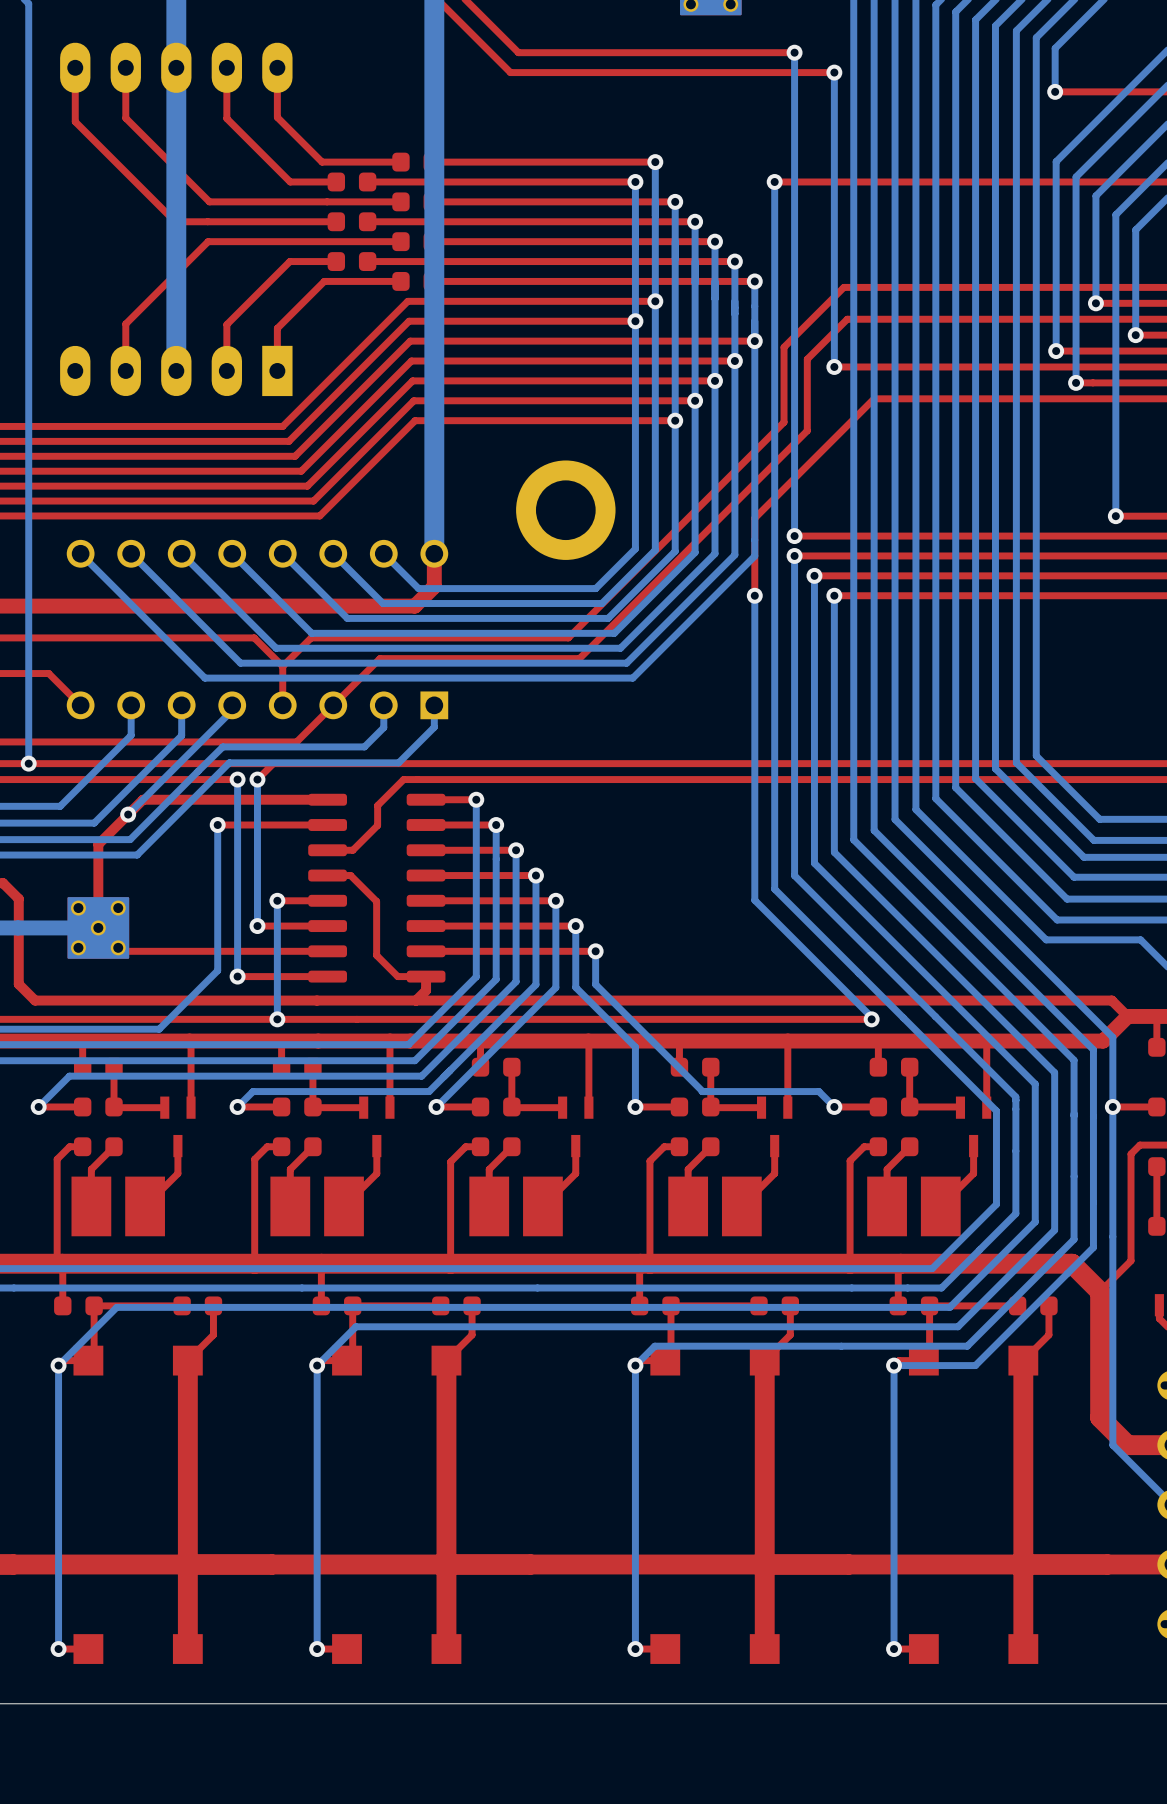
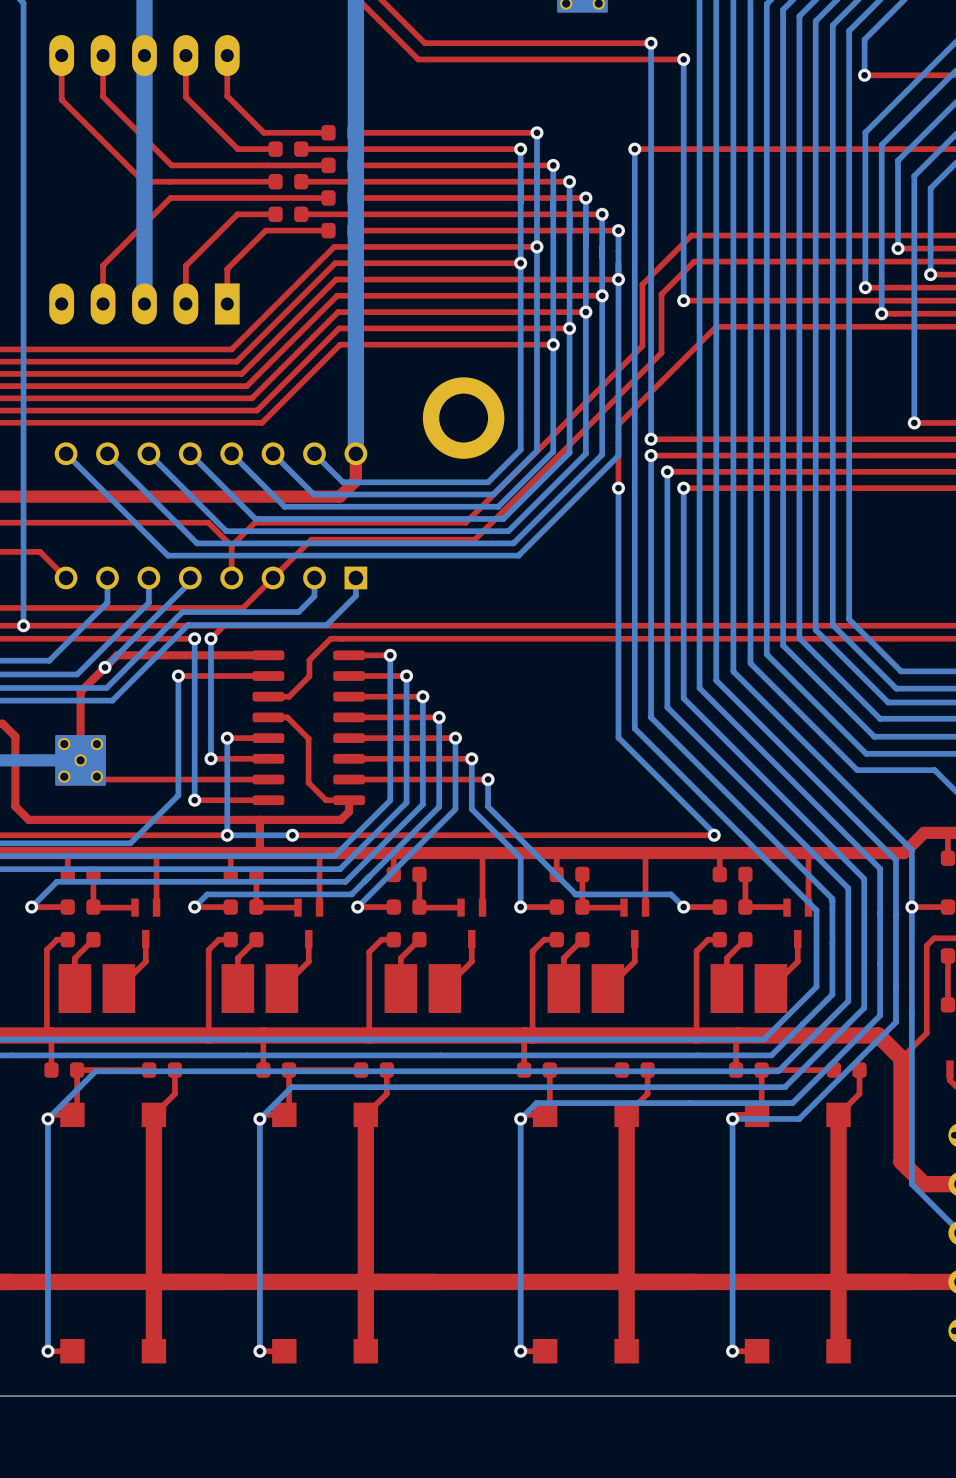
top track: none -> (259, 819) (259, 852)
top track: (416, 1000) (1111, 1000) (1127, 1016) -> none
top track: (356, 1019) (277, 1019) -> none
bottom track: none -> (292, 835) (227, 835)
via: none -> (292, 835)

